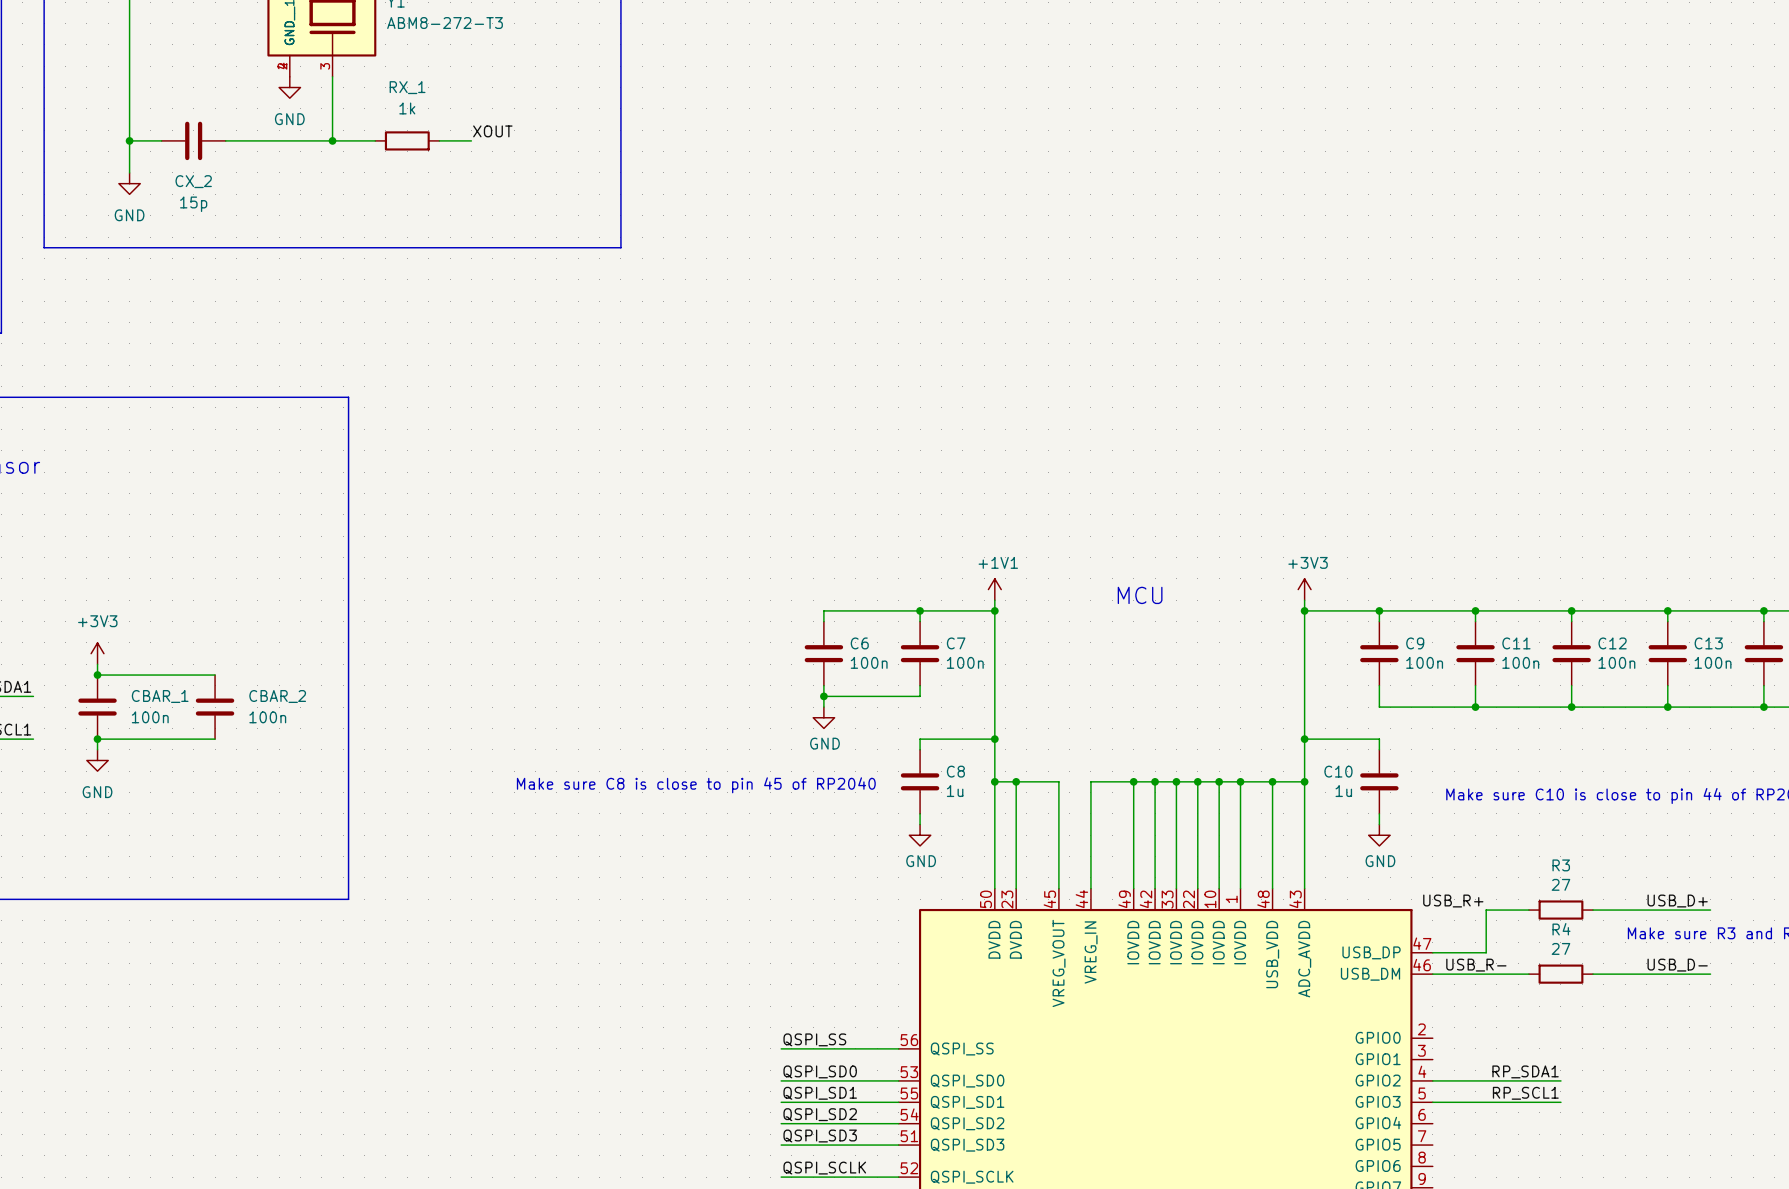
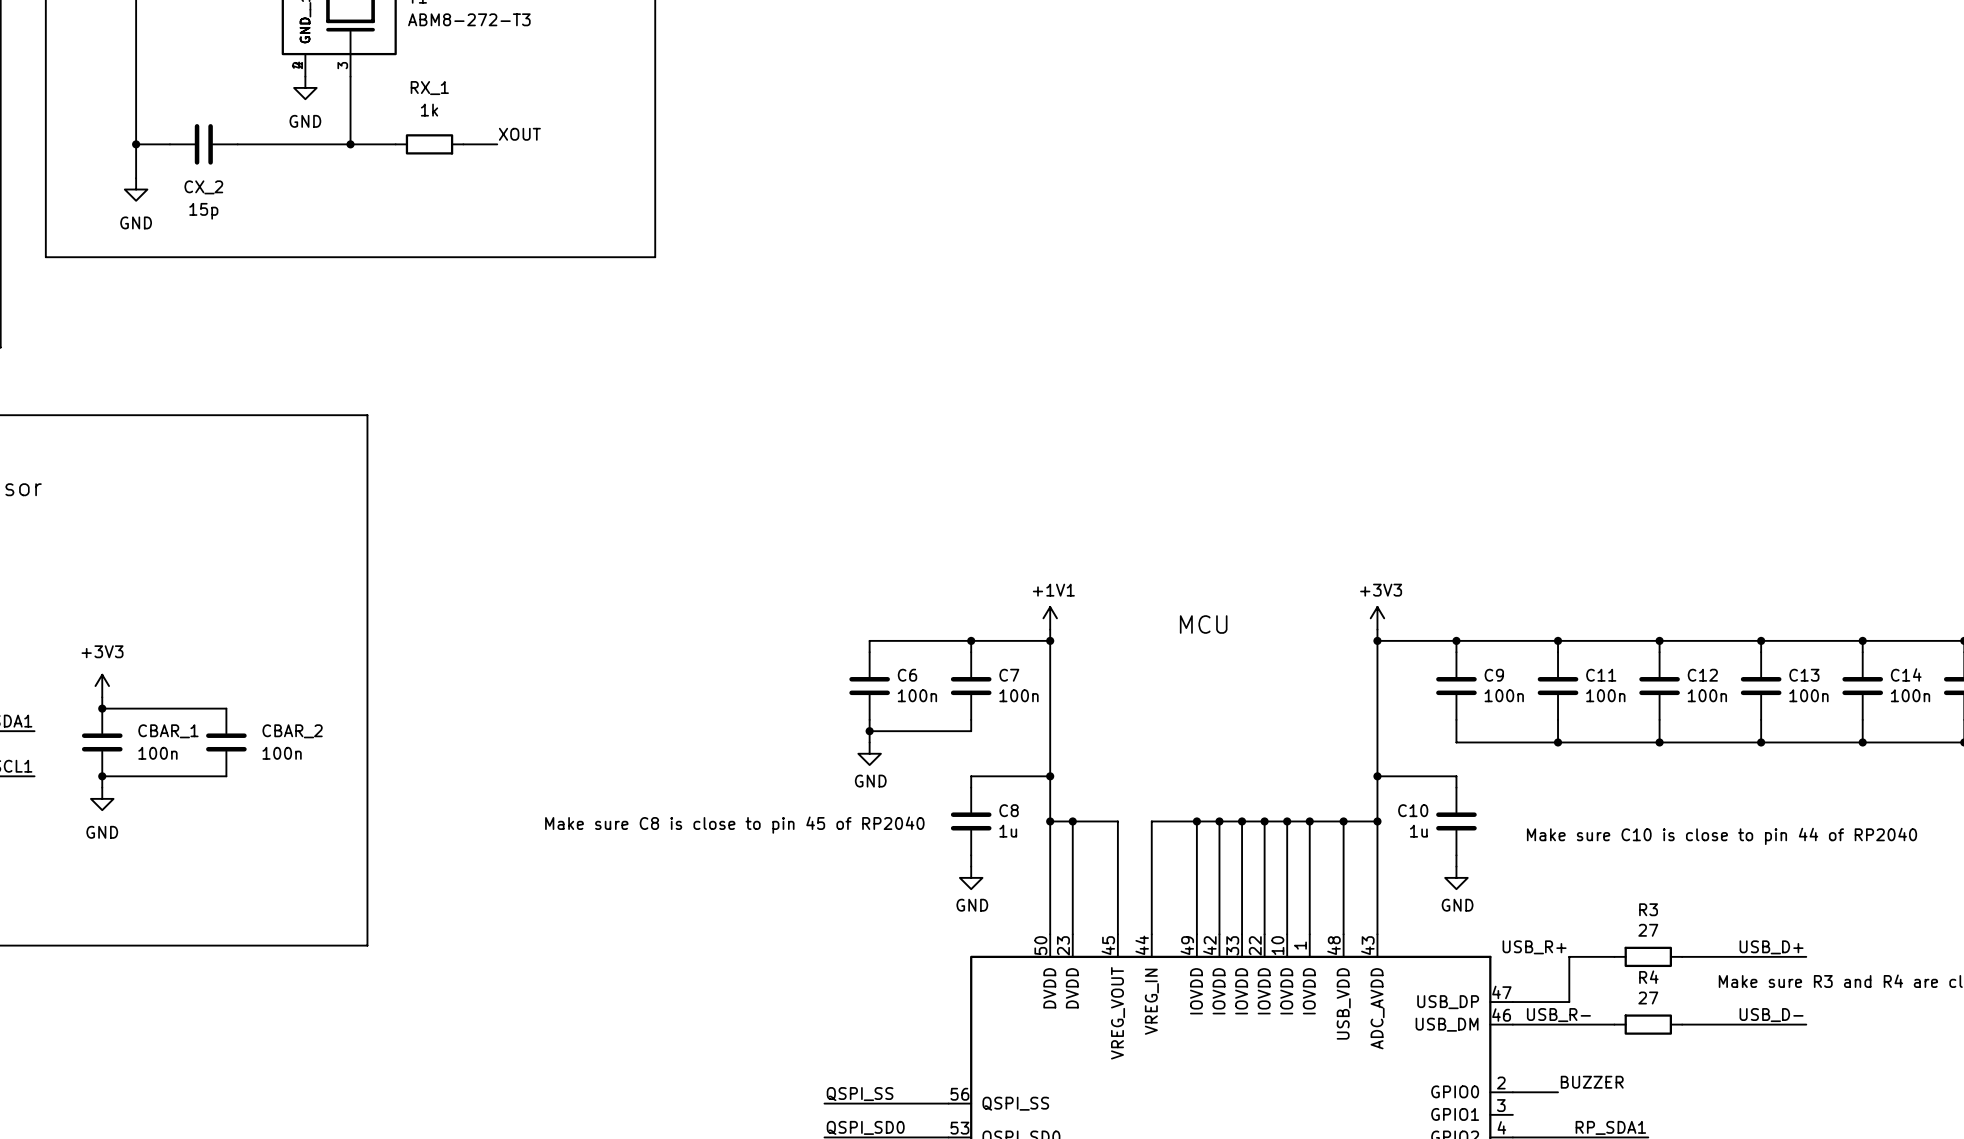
label: none -> BUZZER (1592, 1082)
wire: none -> (1512, 1092) (1558, 1092)

